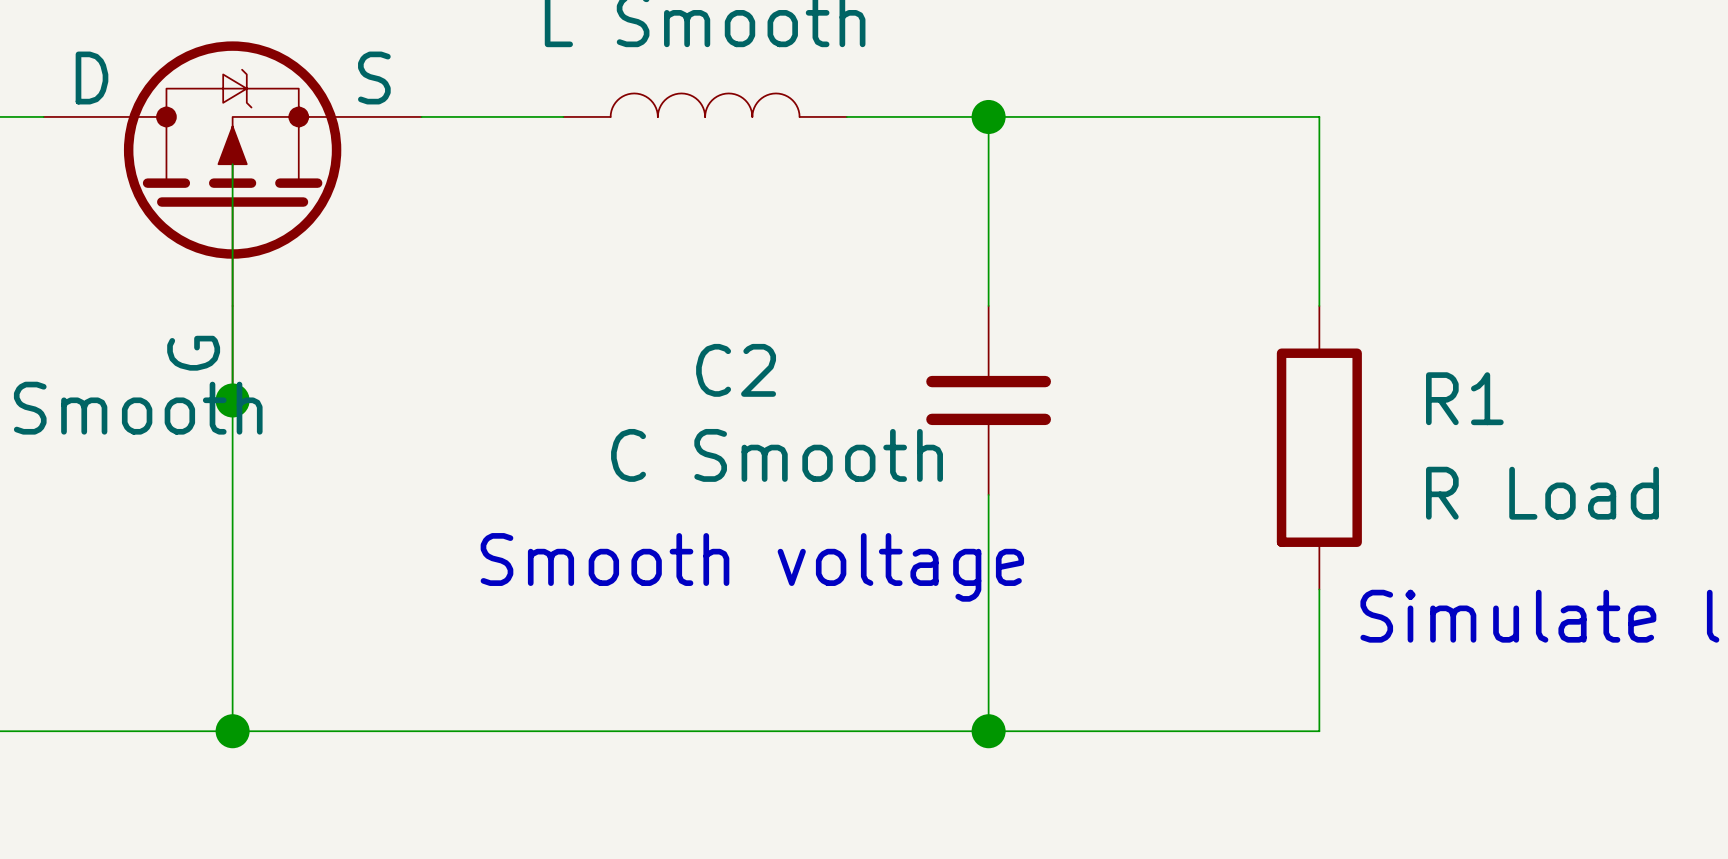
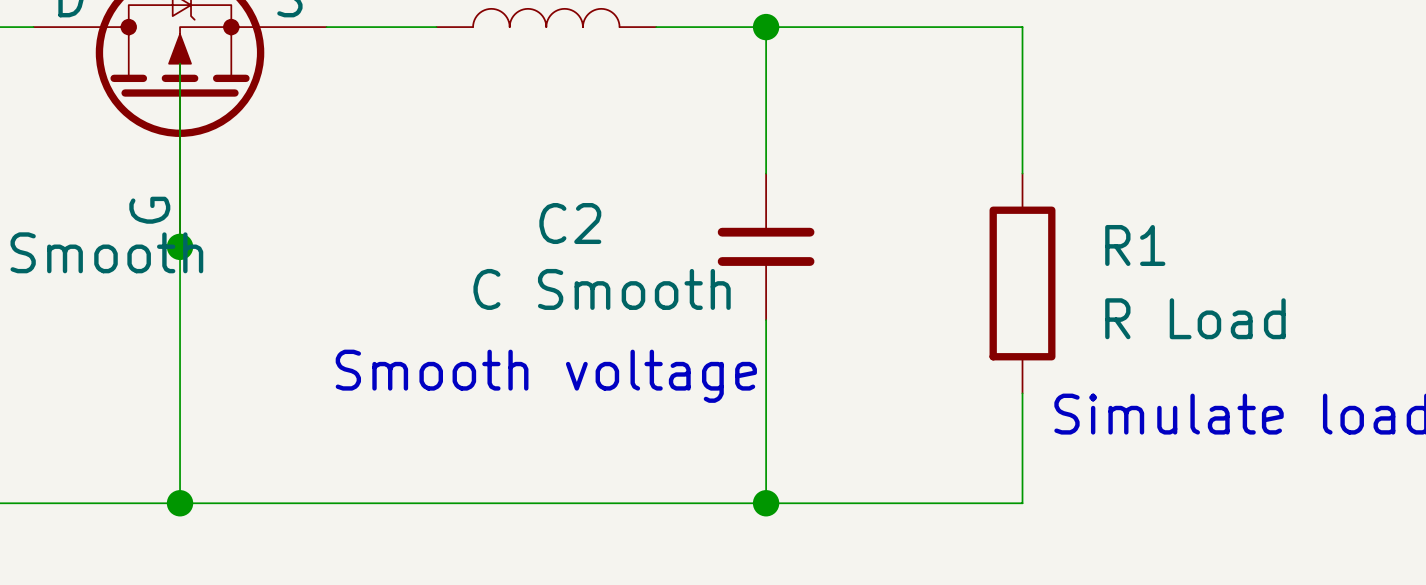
text position: Smooth voltage (752, 567) -> Smooth voltage (546, 376)

